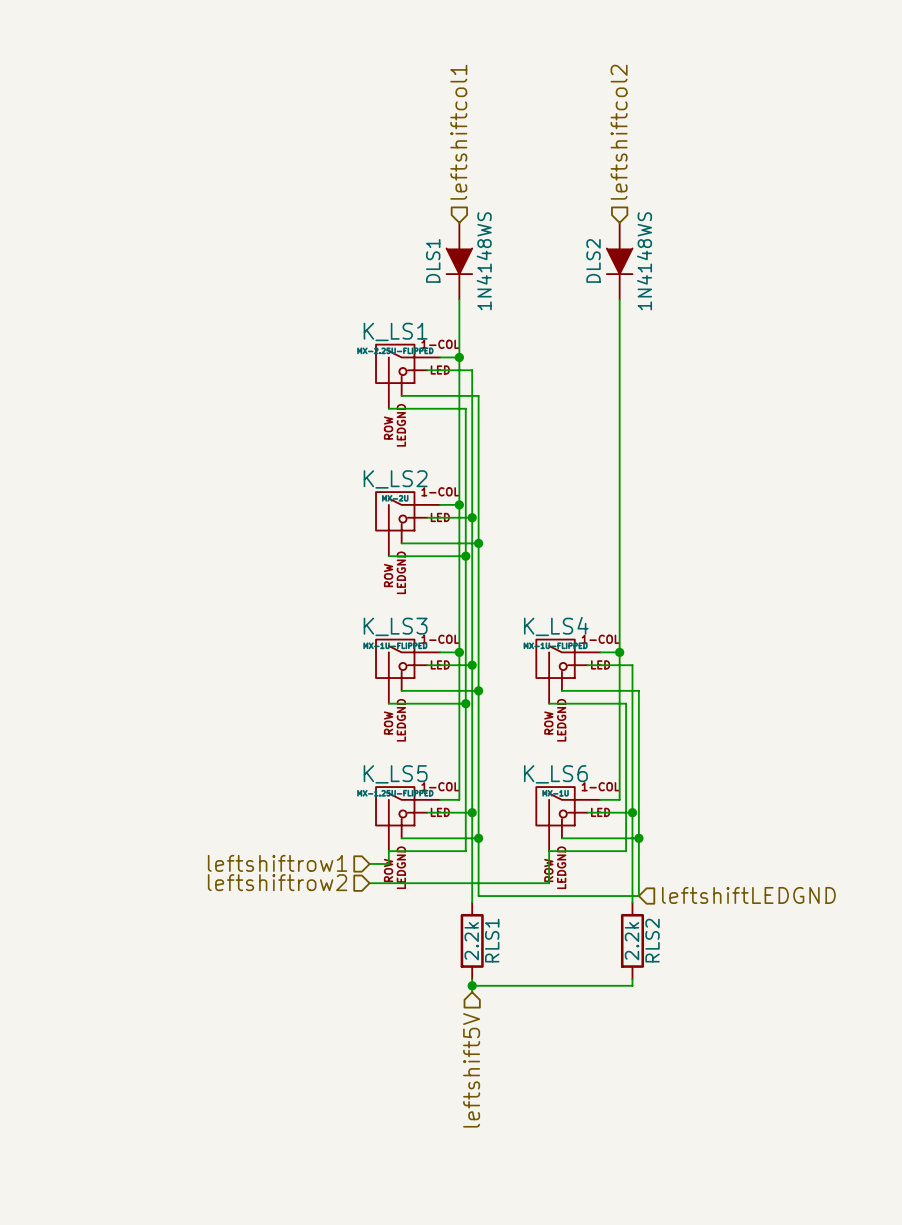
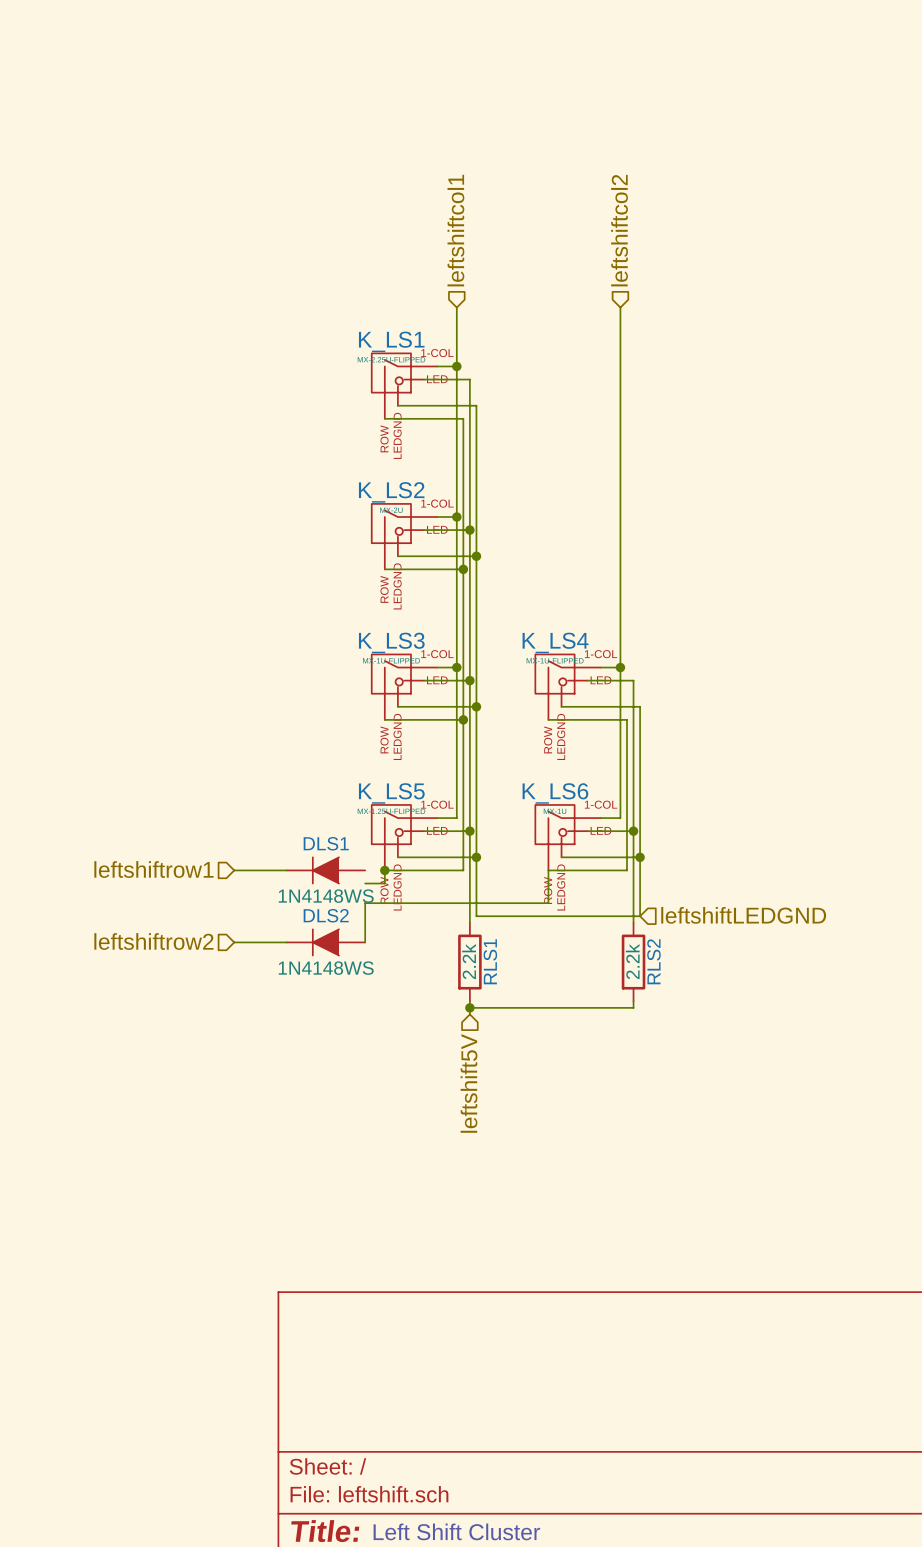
hierarchical label position: leftshiftcol1 (458, 132) -> leftshiftcol1 (455, 230)
hierarchical label position: leftshiftcol2 (619, 132) -> leftshiftcol2 (619, 230)
DLS1 rotation: 0° (459, 261) -> 90° clockwise (325, 870)
DLS1 position: (459, 261) -> (325, 870)
DLS2 rotation: 0° (619, 261) -> 90° clockwise (325, 942)
DLS2 position: (619, 261) -> (325, 942)
wire: none -> (234, 870) (286, 870)
junction: none -> (384, 870)
hierarchical label position: leftshiftrow1 (277, 863) -> leftshiftrow1 (153, 869)
hierarchical label position: leftshiftrow2 (277, 882) -> leftshiftrow2 (153, 941)
wire: none -> (365, 903) (365, 942)
wire: none -> (234, 942) (286, 942)

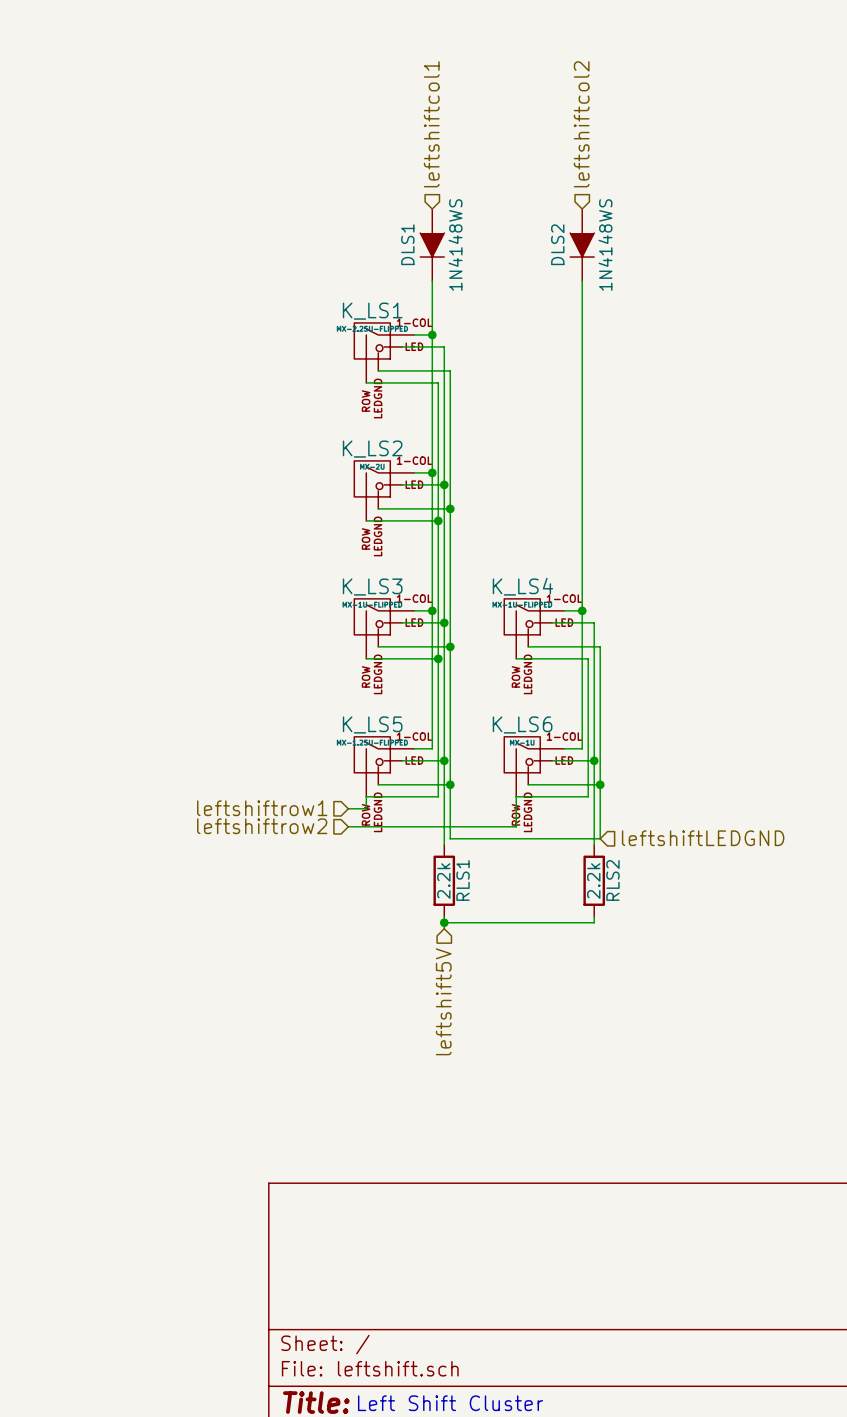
hierarchical label position: leftshiftcol1 (455, 230) -> leftshiftcol1 (431, 124)
hierarchical label position: leftshiftcol2 (619, 230) -> leftshiftcol2 (581, 124)
hierarchical label position: leftshiftrow1 (153, 869) -> leftshiftrow1 (262, 808)
wire: (234, 870) (286, 870) -> none
DLS1 rotation: 0° (325, 870) -> 90° counterclockwise (432, 245)
DLS1 position: (325, 870) -> (432, 245)
junction: (384, 870) -> none
wire: (365, 903) (365, 942) -> none
hierarchical label position: leftshiftrow2 (153, 941) -> leftshiftrow2 (262, 826)
wire: (234, 942) (286, 942) -> none
DLS2 rotation: 0° (325, 942) -> 90° counterclockwise (582, 245)
DLS2 position: (325, 942) -> (582, 245)

